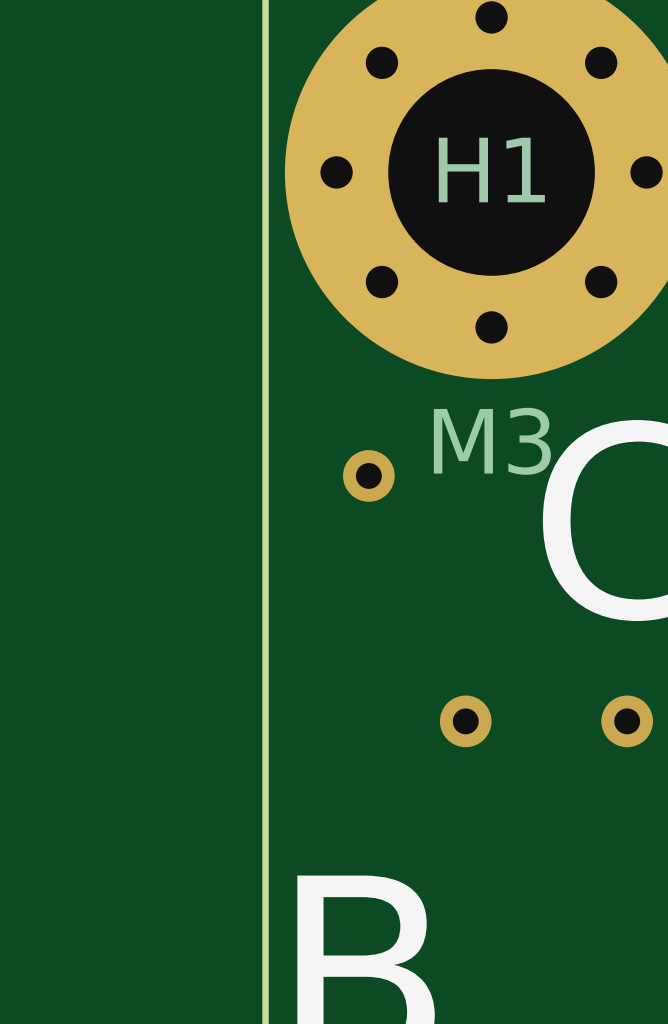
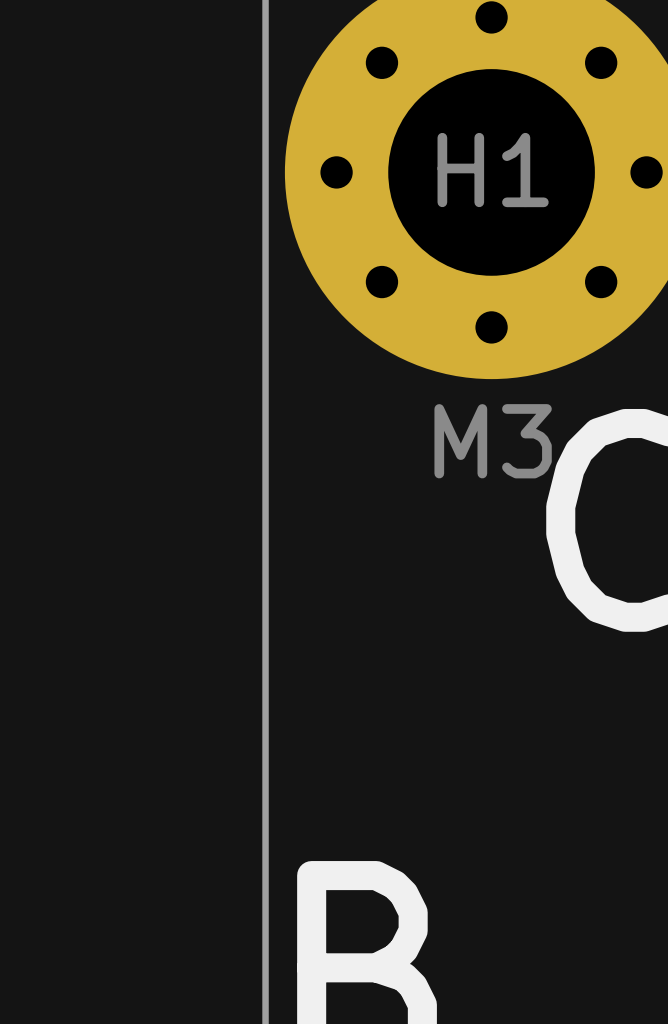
via: (368, 475) -> none
via: (465, 721) -> none
via: (627, 721) -> none

